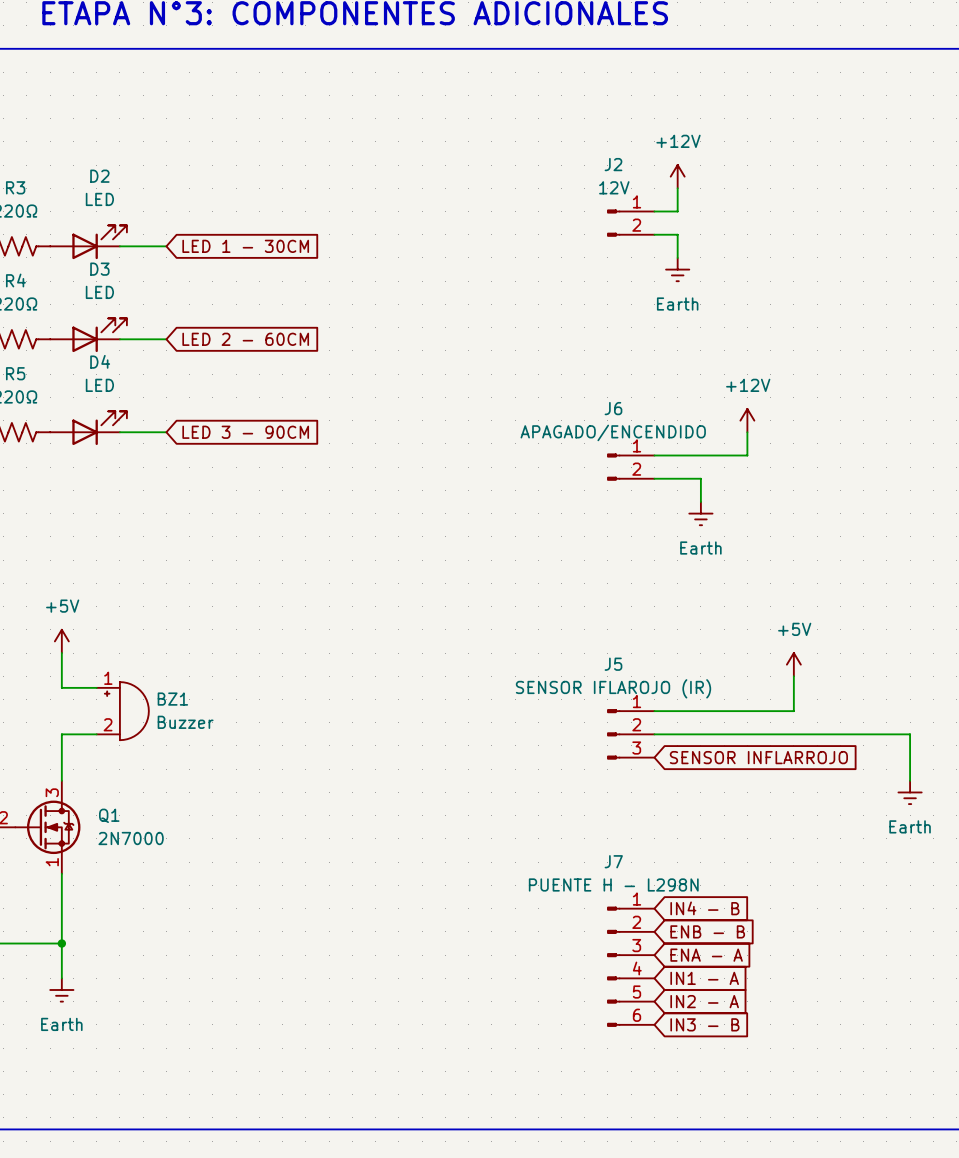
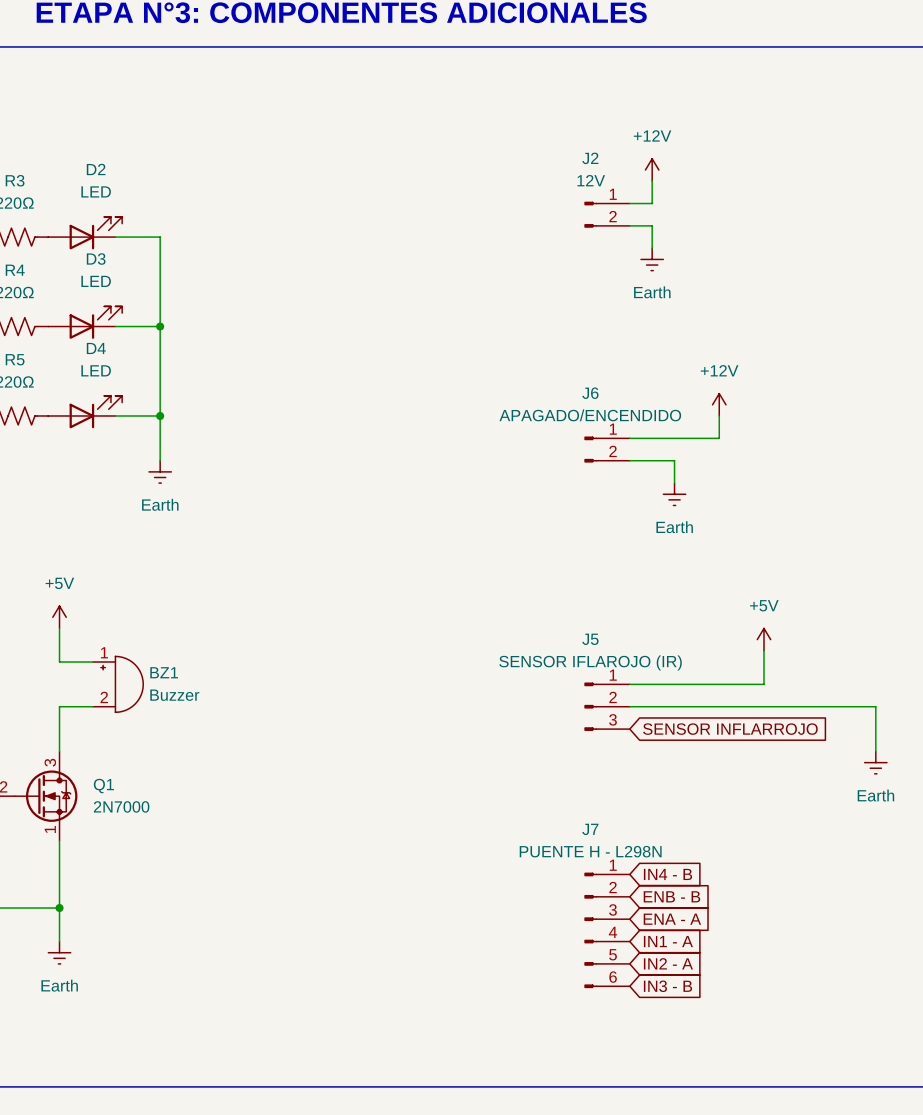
wire: none -> (160, 237) (160, 460)
global label: LED 1 - 30CM (245, 246) -> none
junction: none -> (160, 326)
global label: LED 2 - 60CM (245, 339) -> none
junction: none -> (160, 415)
global label: LED 3 - 90CM (245, 432) -> none
power symbol: none -> Earth (160, 471)

